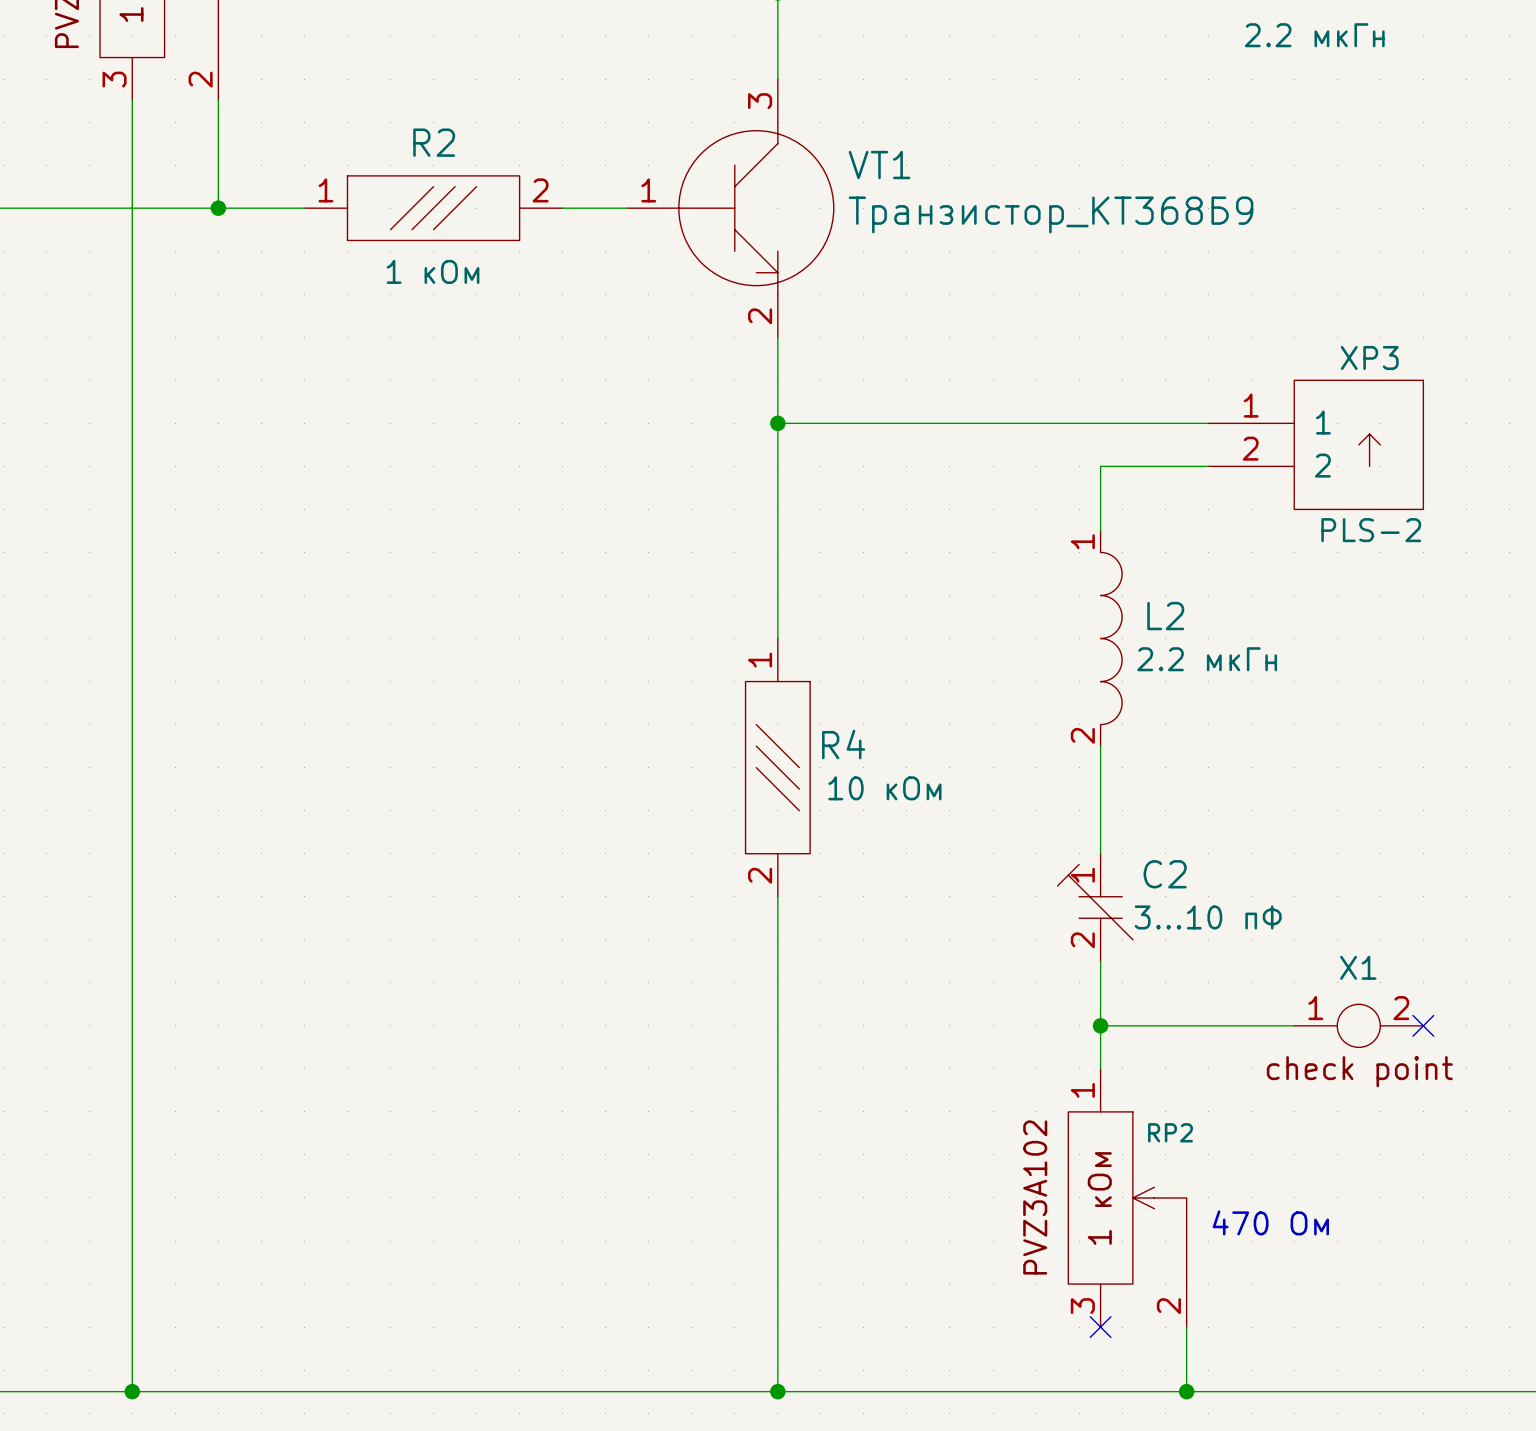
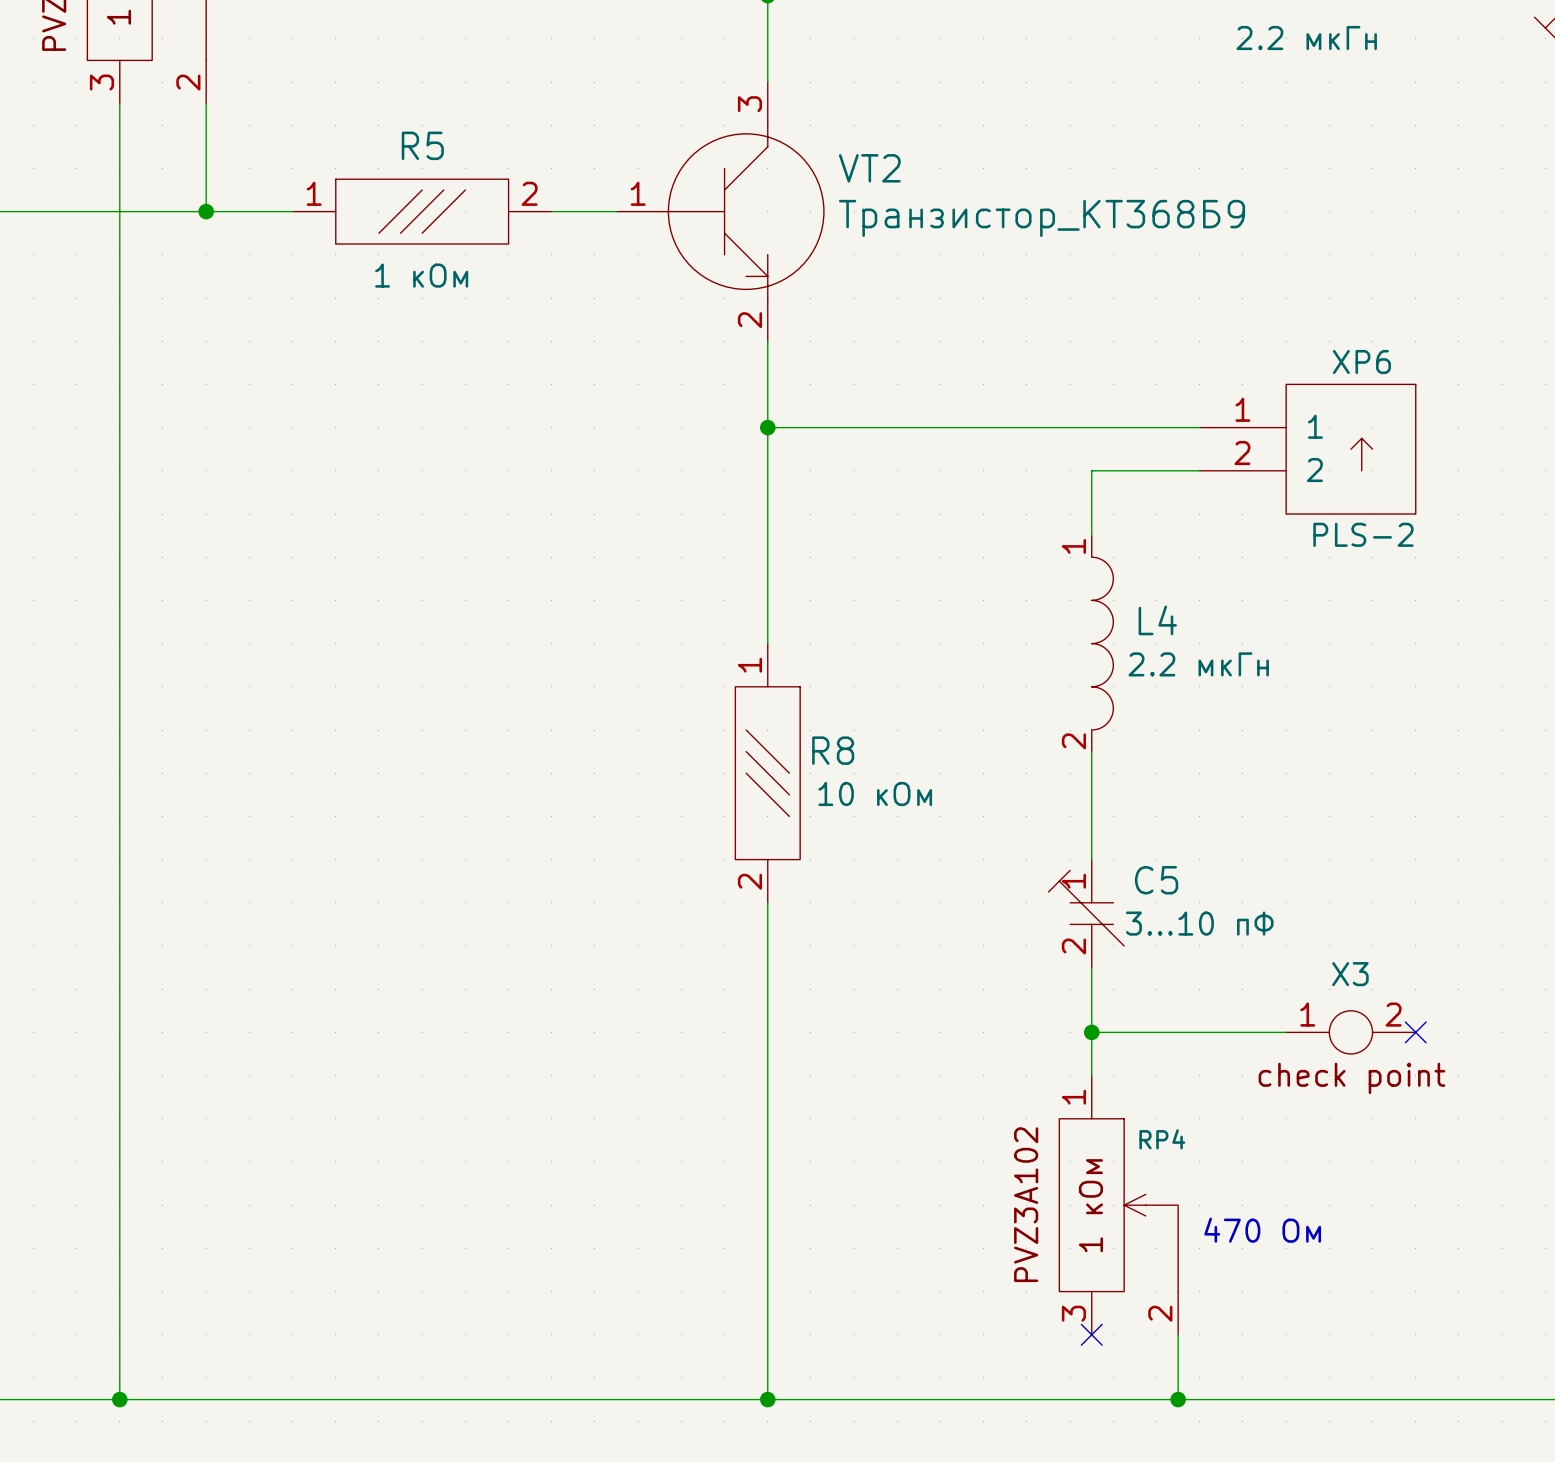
R2 name: R2 (434, 142) -> R5 (422, 145)
VT1 name: VT1 (879, 165) -> VT2 (869, 168)
XP3 name: XP3 (1369, 357) -> XP6 (1361, 362)
L2 name: L2 (1165, 616) -> L4 (1157, 620)
R4 name: R4 (843, 744) -> R8 (833, 750)
C2 name: C2 (1165, 874) -> C5 (1156, 880)
X1 name: X1 (1358, 967) -> X3 (1350, 974)
RP2 name: RP2 (1170, 1132) -> RP4 (1162, 1139)

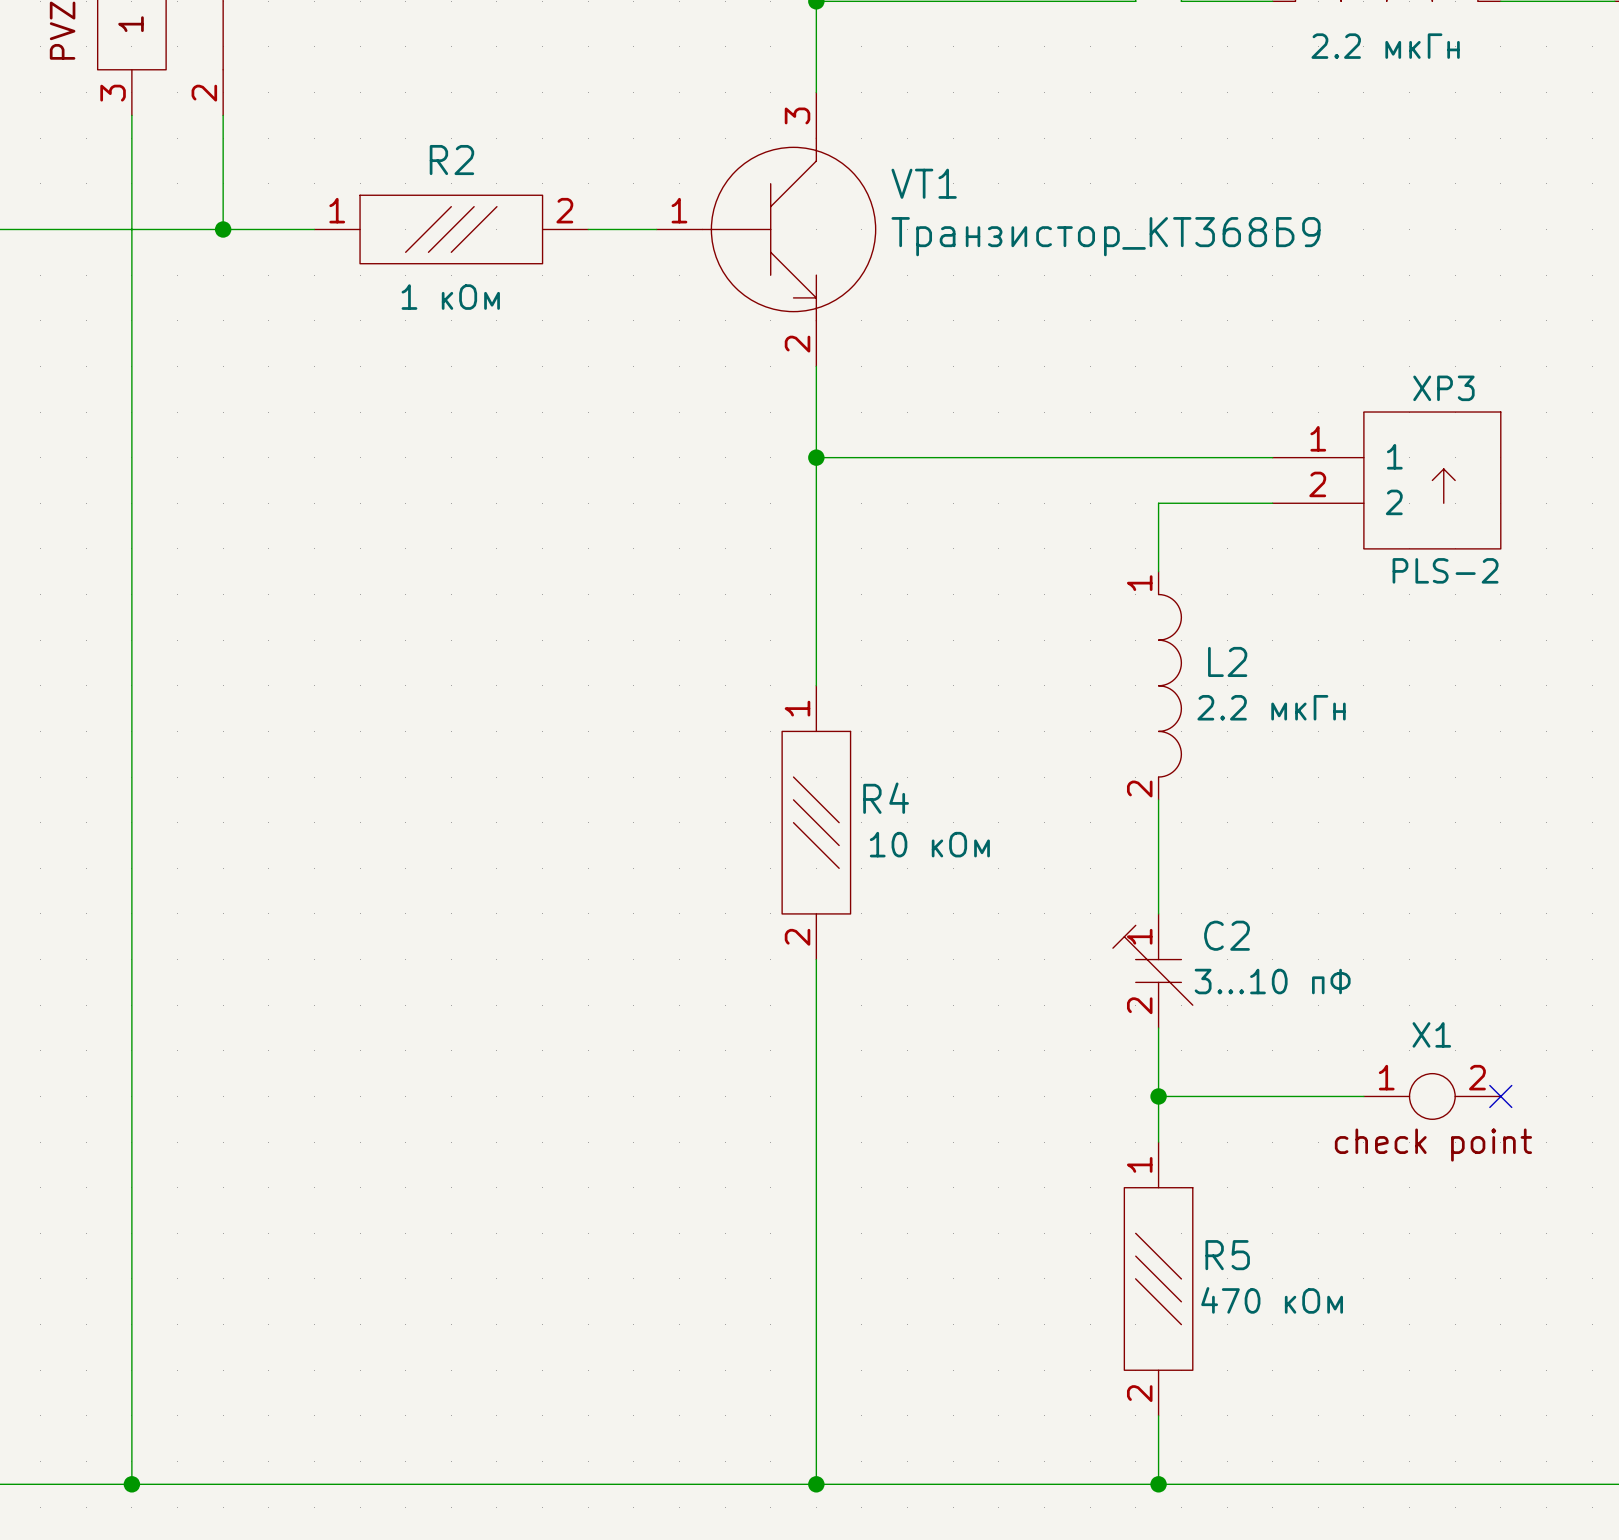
R5 name: R5 (422, 145) -> R2 (451, 160)
VT2 name: VT2 (869, 168) -> VT1 (924, 183)
XP6 name: XP6 (1361, 362) -> XP3 (1443, 388)
L4 name: L4 (1157, 620) -> L2 (1227, 661)
R8 name: R8 (833, 750) -> R4 (886, 798)
C5 name: C5 (1156, 880) -> C2 (1227, 935)
X3 name: X3 (1350, 974) -> X1 (1431, 1034)
R5: none -> (1158, 1278)
RP4: (1118, 1205) -> none
text: 470 Ом (1262, 1230) -> none
no-connect mark: (1091, 1334) -> none
wire: (1178, 1334) (1178, 1399) -> (1158, 1415) (1158, 1484)
junction position: (1178, 1399) -> (1158, 1484)

